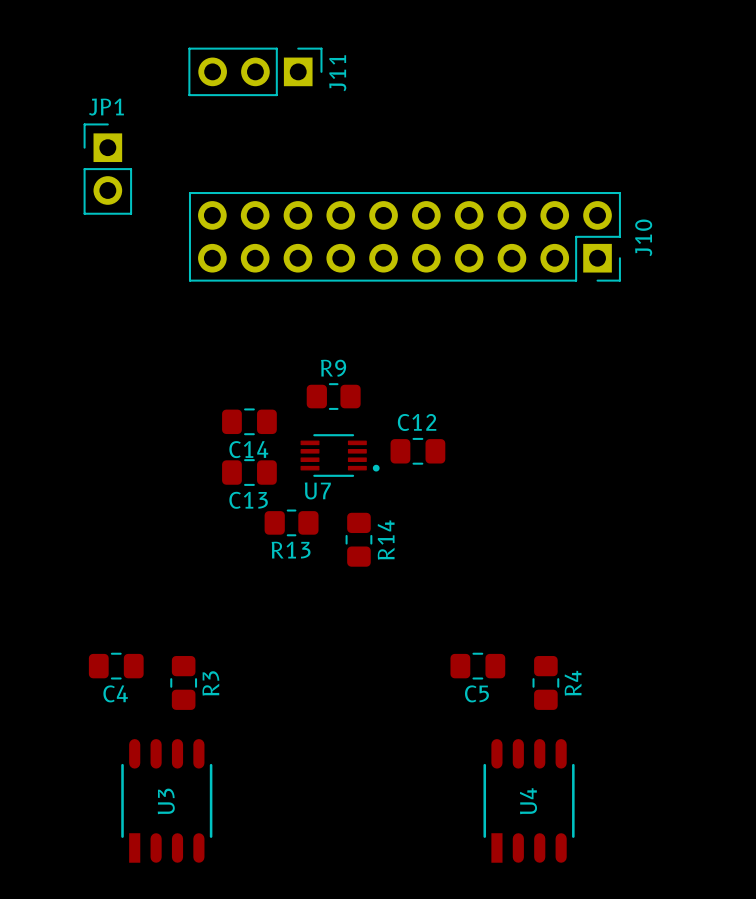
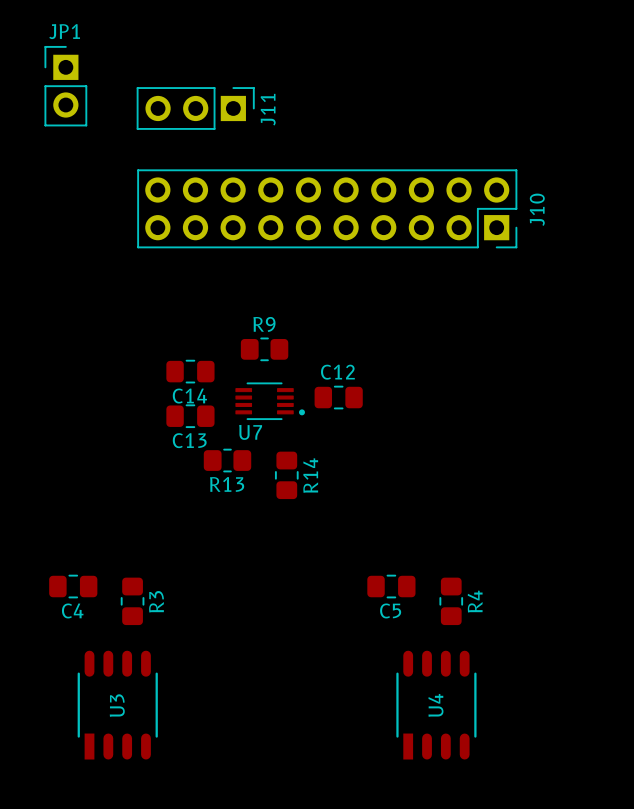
J11 position: (255, 71) -> (195, 108)
JP1 position: (107, 169) -> (65, 86)

